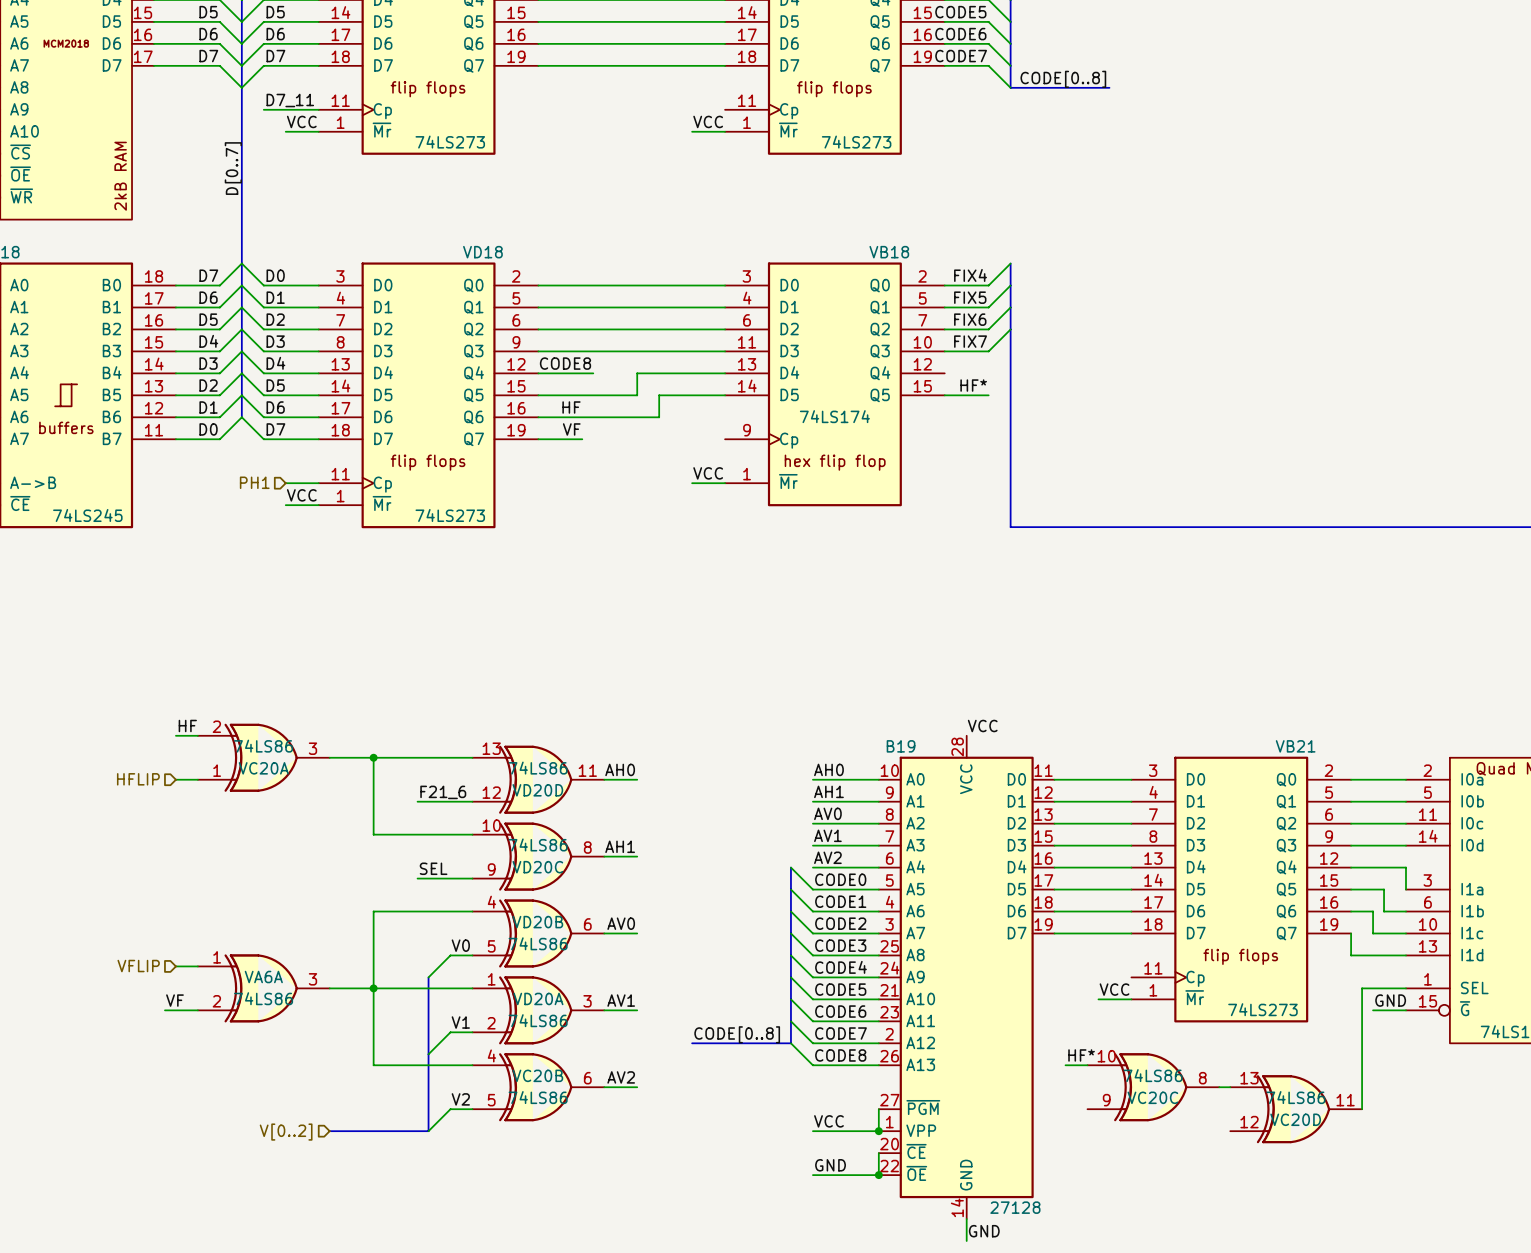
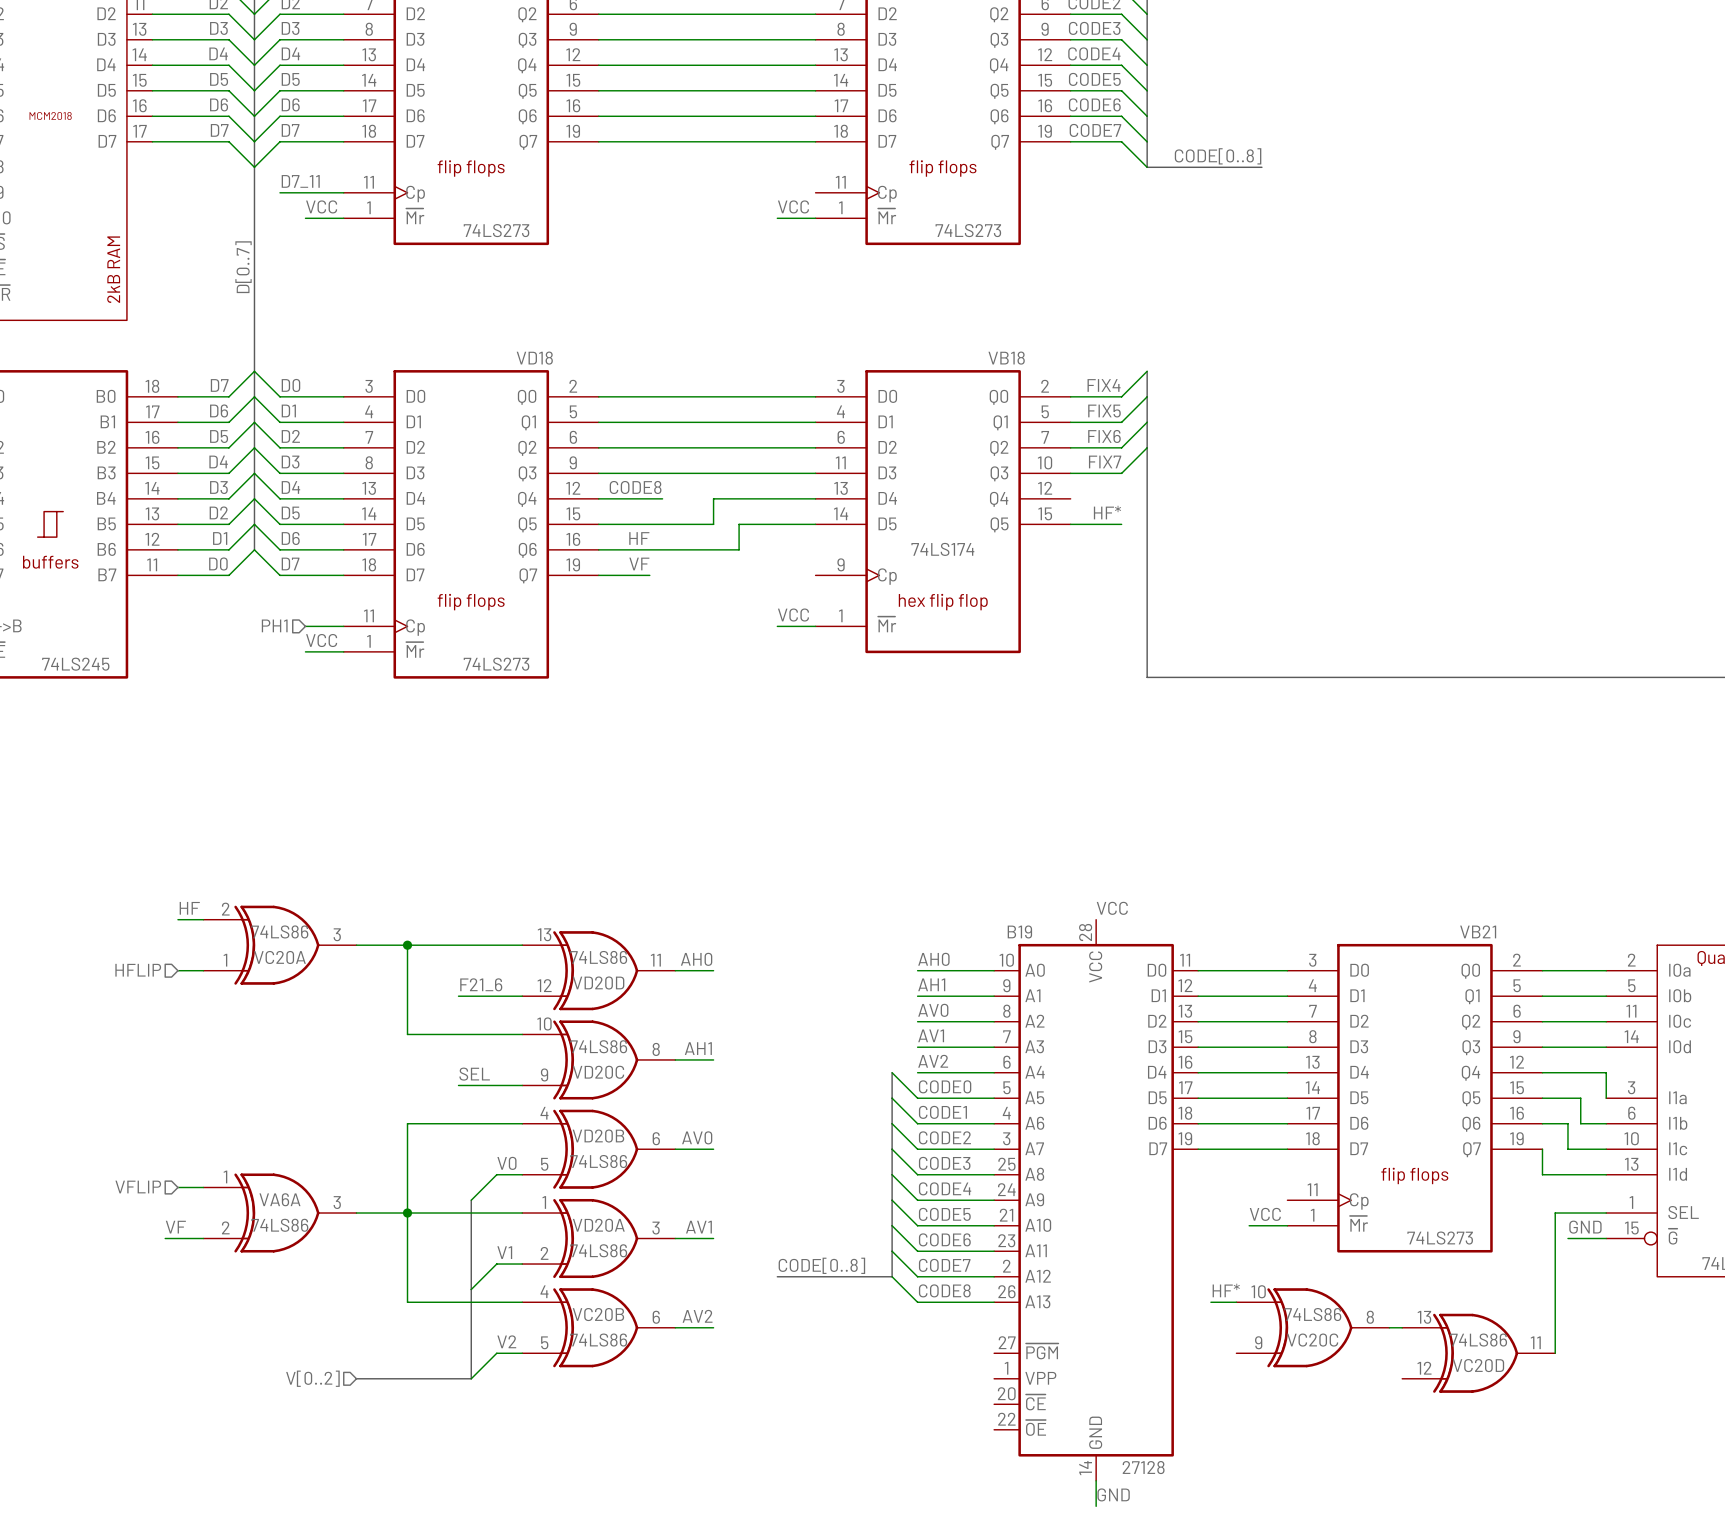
wire: (878, 1109) (878, 1131) (812, 1131) -> none
label: VCC (828, 1121) -> none
junction: (878, 1131) -> none
wire: (878, 1153) (878, 1175) (812, 1175) -> none
label: GND (830, 1165) -> none
junction: (878, 1175) -> none

